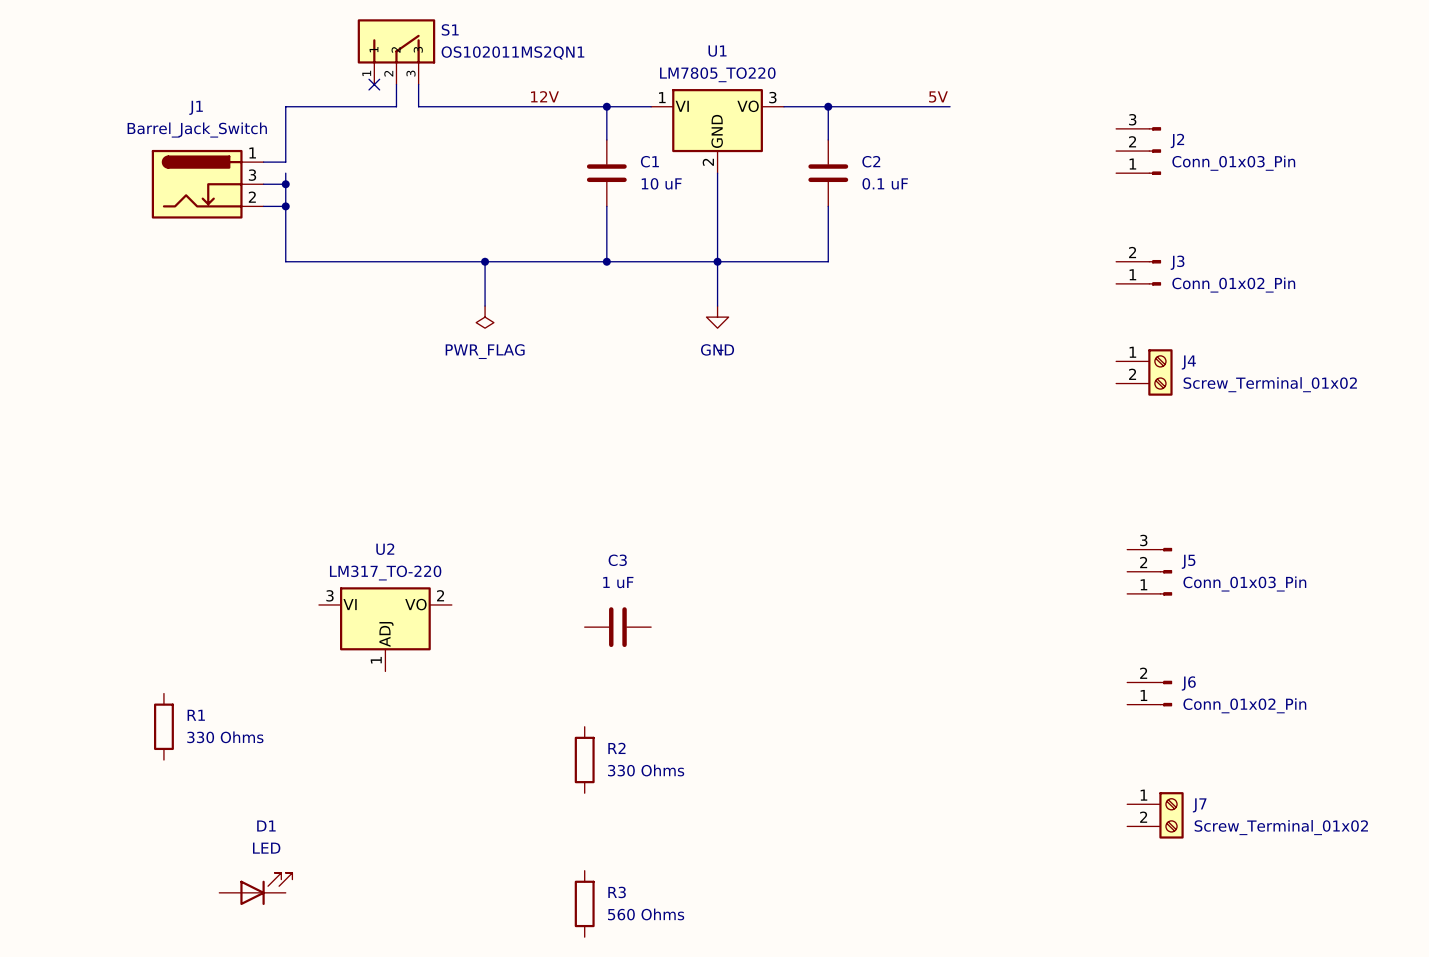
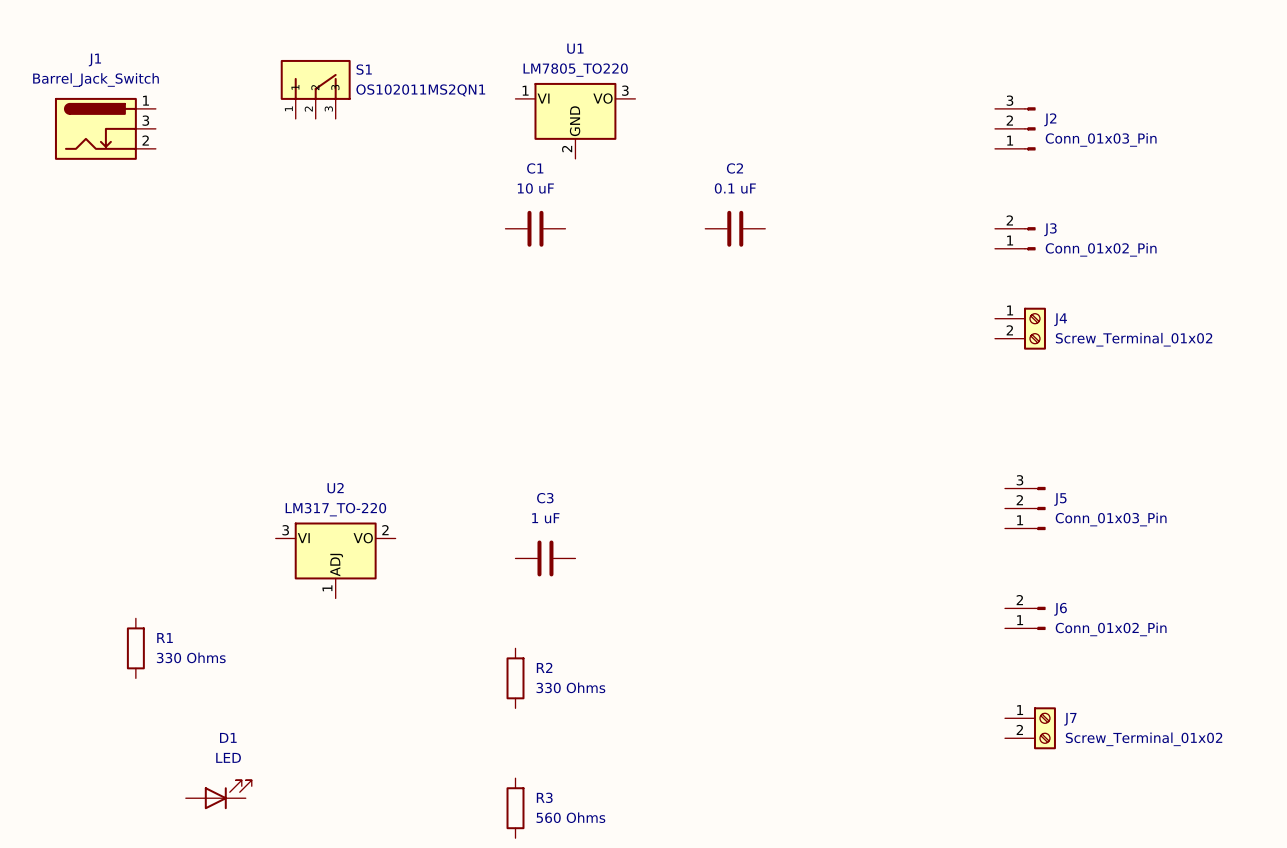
S1 position: (396, 51) -> (315, 89)
no-connect mark: (374, 84) -> none
wire: (396, 84) (396, 106) (285, 106) (285, 162) (263, 162) -> none
wire: (418, 84) (418, 106) (651, 106) -> none
label: 12V (544, 96) -> none
label: 5V (938, 96) -> none
junction: (606, 106) -> none
wire: (783, 106) (950, 106) -> none
wire: (828, 106) (828, 139) -> none
junction: (828, 106) -> none
U1 position: (717, 131) -> (575, 120)
C1 name position: C1 (649, 161) -> C1 (535, 168)
C2 name position: C2 (871, 161) -> C2 (734, 168)
wire: (285, 173) (285, 261) (828, 261) (828, 206) -> none
C1 rotation: 0° (606, 173) -> 90° clockwise (535, 228)
C1 position: (606, 173) -> (535, 228)
wire: (717, 173) (717, 306) -> none
C2 rotation: 0° (828, 173) -> 90° clockwise (735, 228)
C2 position: (828, 173) -> (735, 228)
C1 value position: 10 uF (661, 183) -> 10 uF (535, 188)
C2 value position: 0.1 uF (885, 183) -> 0.1 uF (735, 188)
J1 position: (207, 184) -> (105, 128)
wire: (263, 184) (285, 184) -> none
junction: (285, 184) -> none
wire: (263, 206) (285, 206) -> none
junction: (285, 206) -> none
wire: (606, 206) (606, 261) -> none
wire: (485, 261) (485, 306) -> none
junction: (485, 261) -> none
junction: (606, 261) -> none
junction: (717, 261) -> none
power symbol: PWR_FLAG (485, 317) -> none
power symbol: GND (717, 317) -> none
wire: (717, 350) (723, 350) -> none

